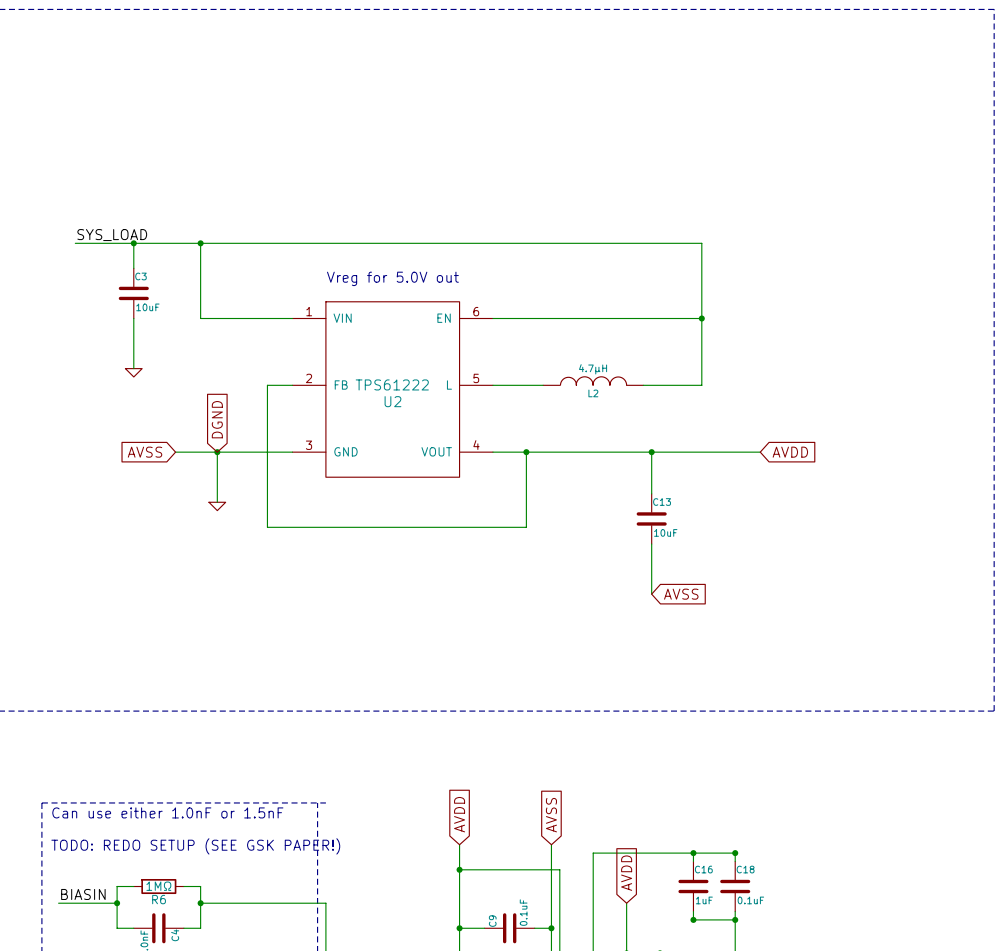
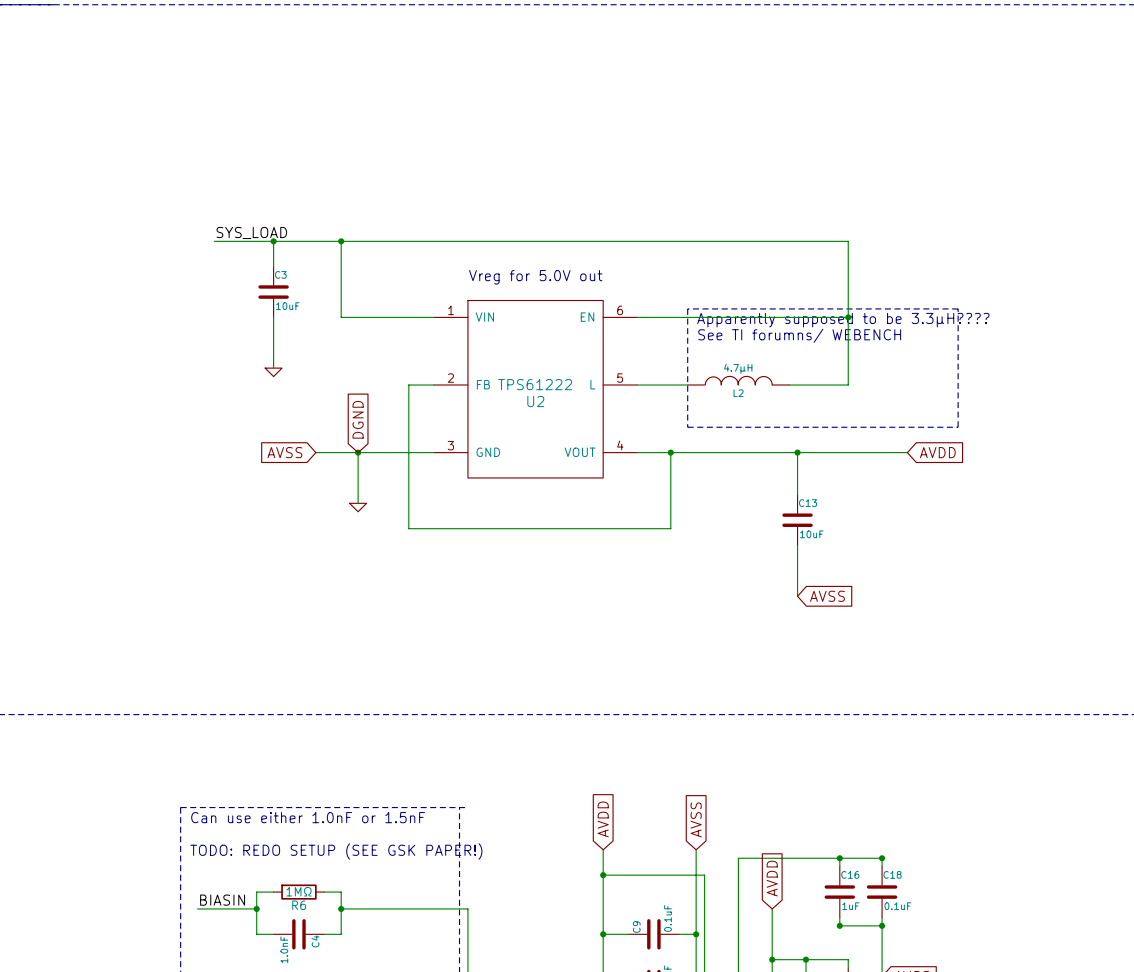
line: none -> (687, 308) (958, 308) (958, 427) (687, 427) (687, 308)
text: none -> Apparently supposed to be 3.3µH???? (843, 320)
text: none -> See TI forumns/ WEBENCH (799, 335)

